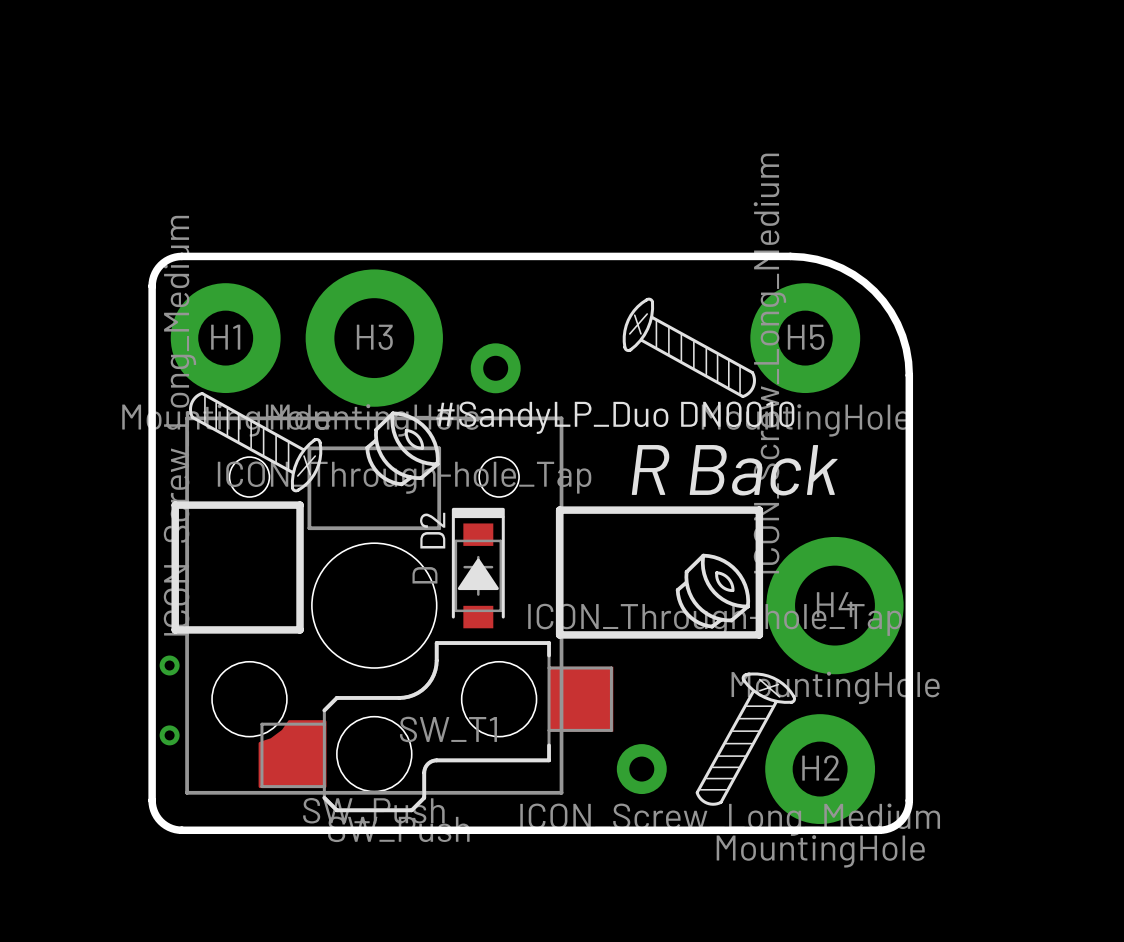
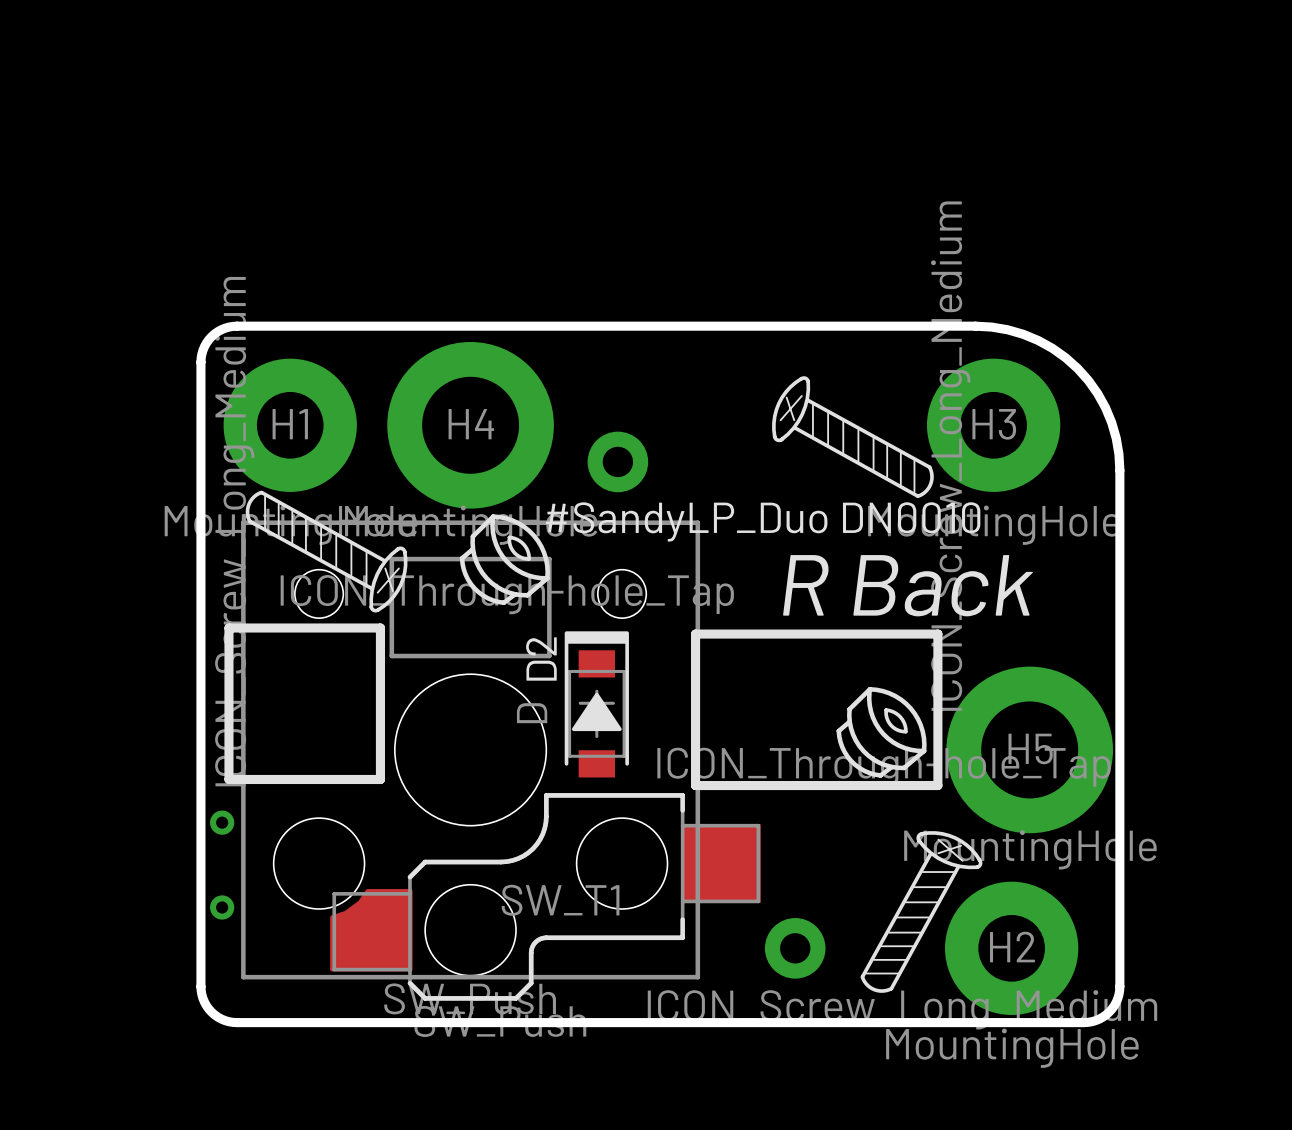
H3 name: H3 (374, 337) -> H4 (471, 424)
H5 name: H5 (806, 337) -> H3 (994, 424)
H4 name: H4 (835, 604) -> H5 (1030, 748)

